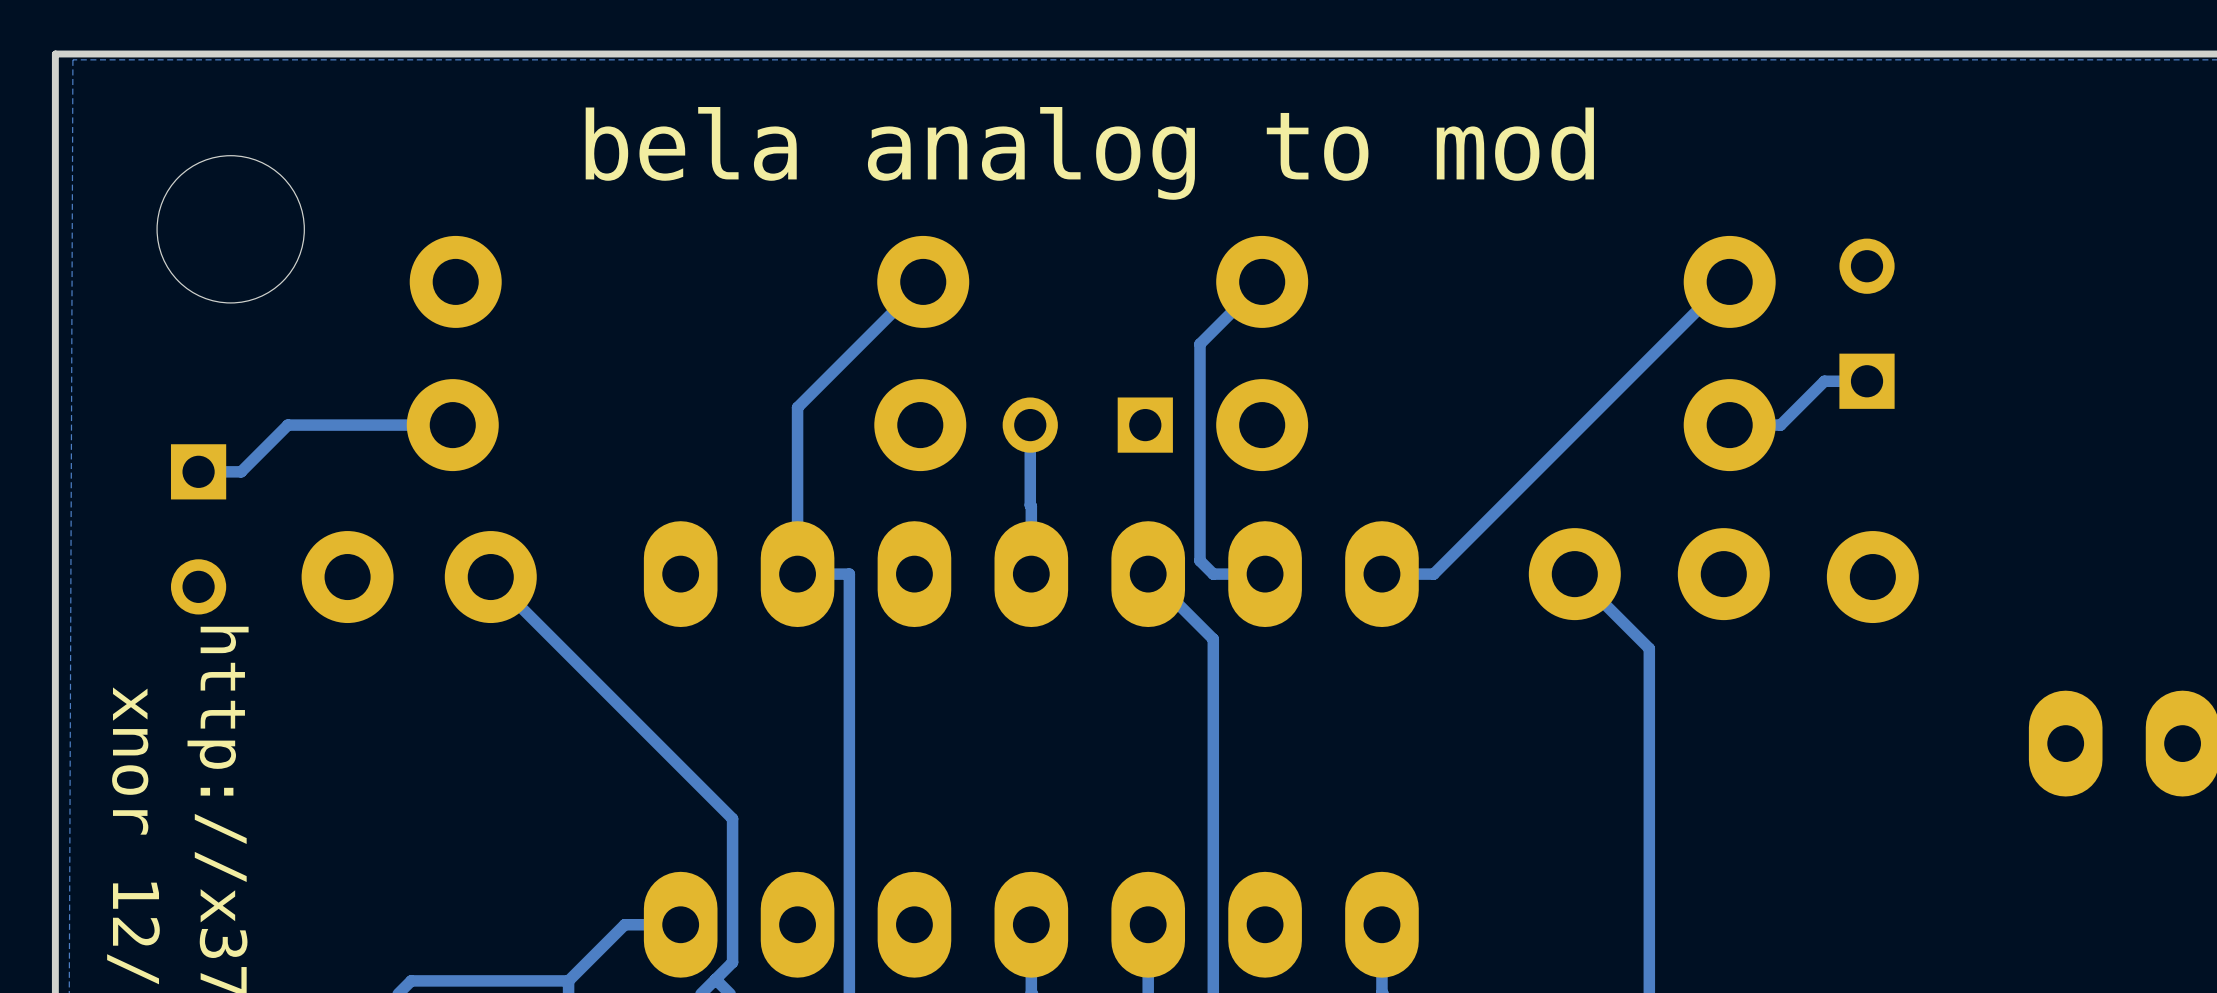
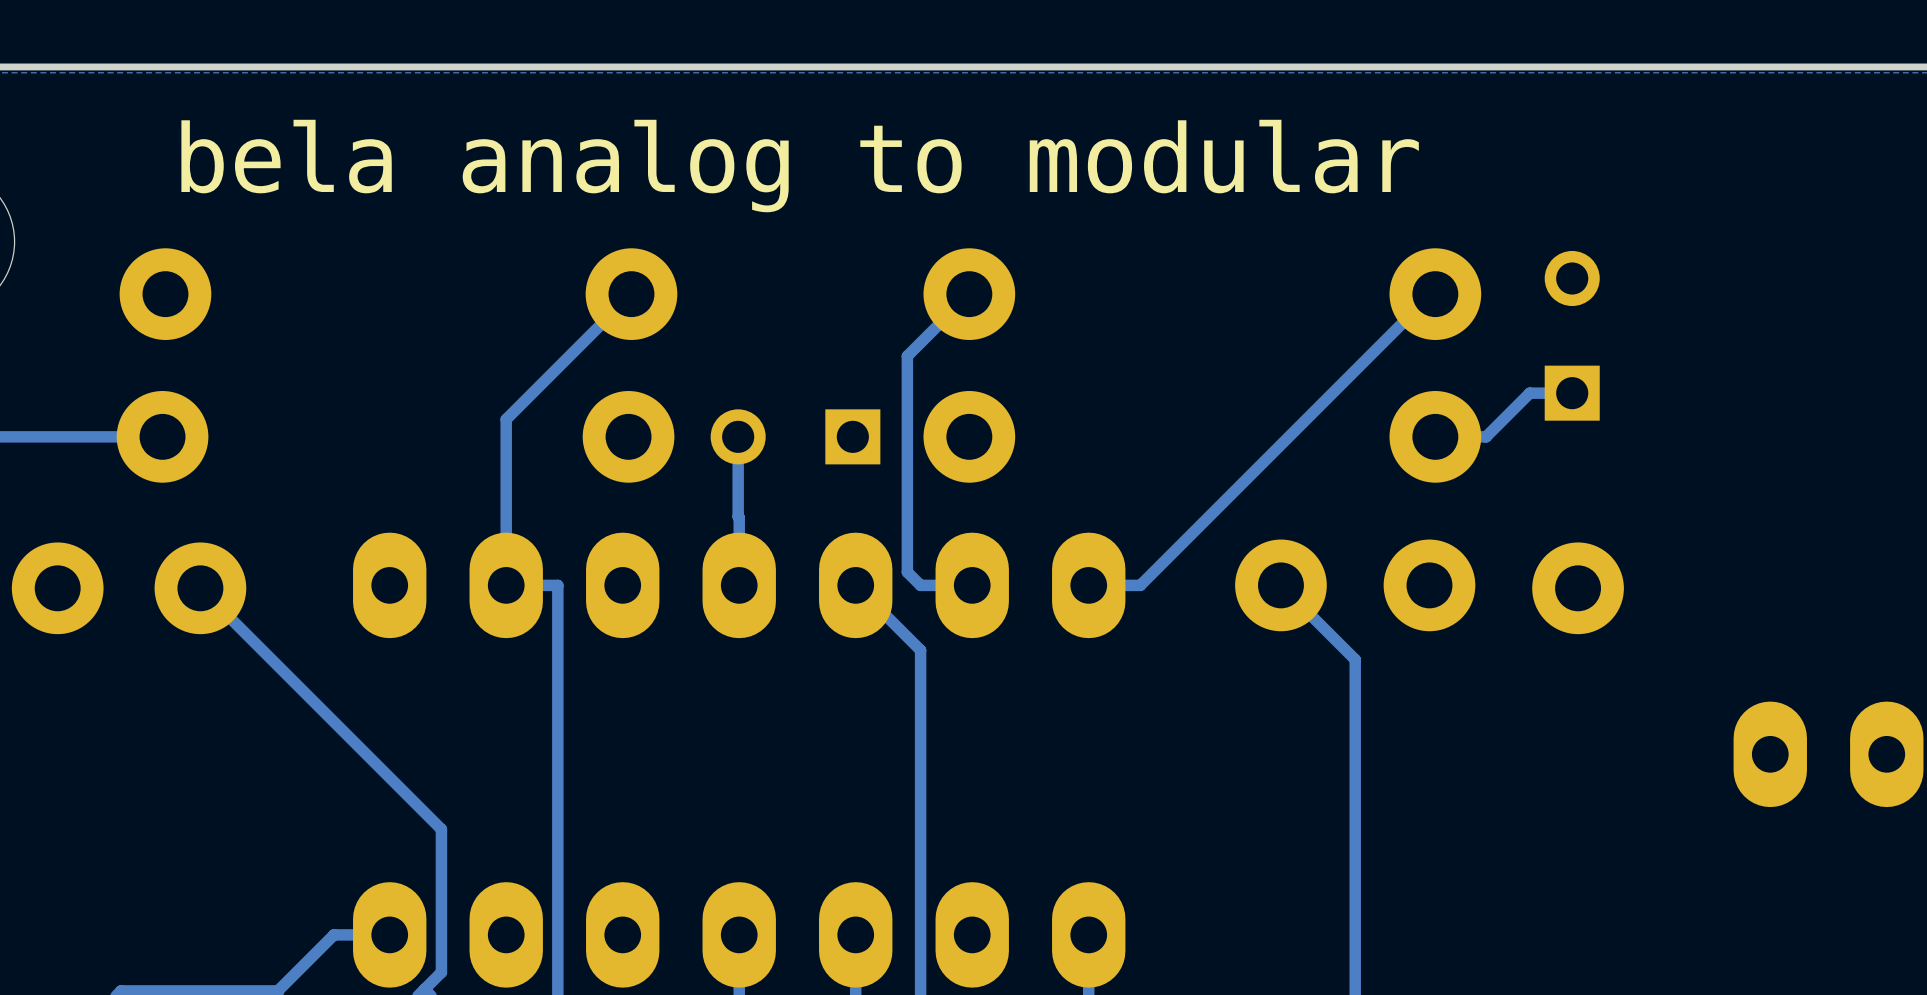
text: bela analog to mod (1089, 153) -> bela analog to modular (800, 166)

